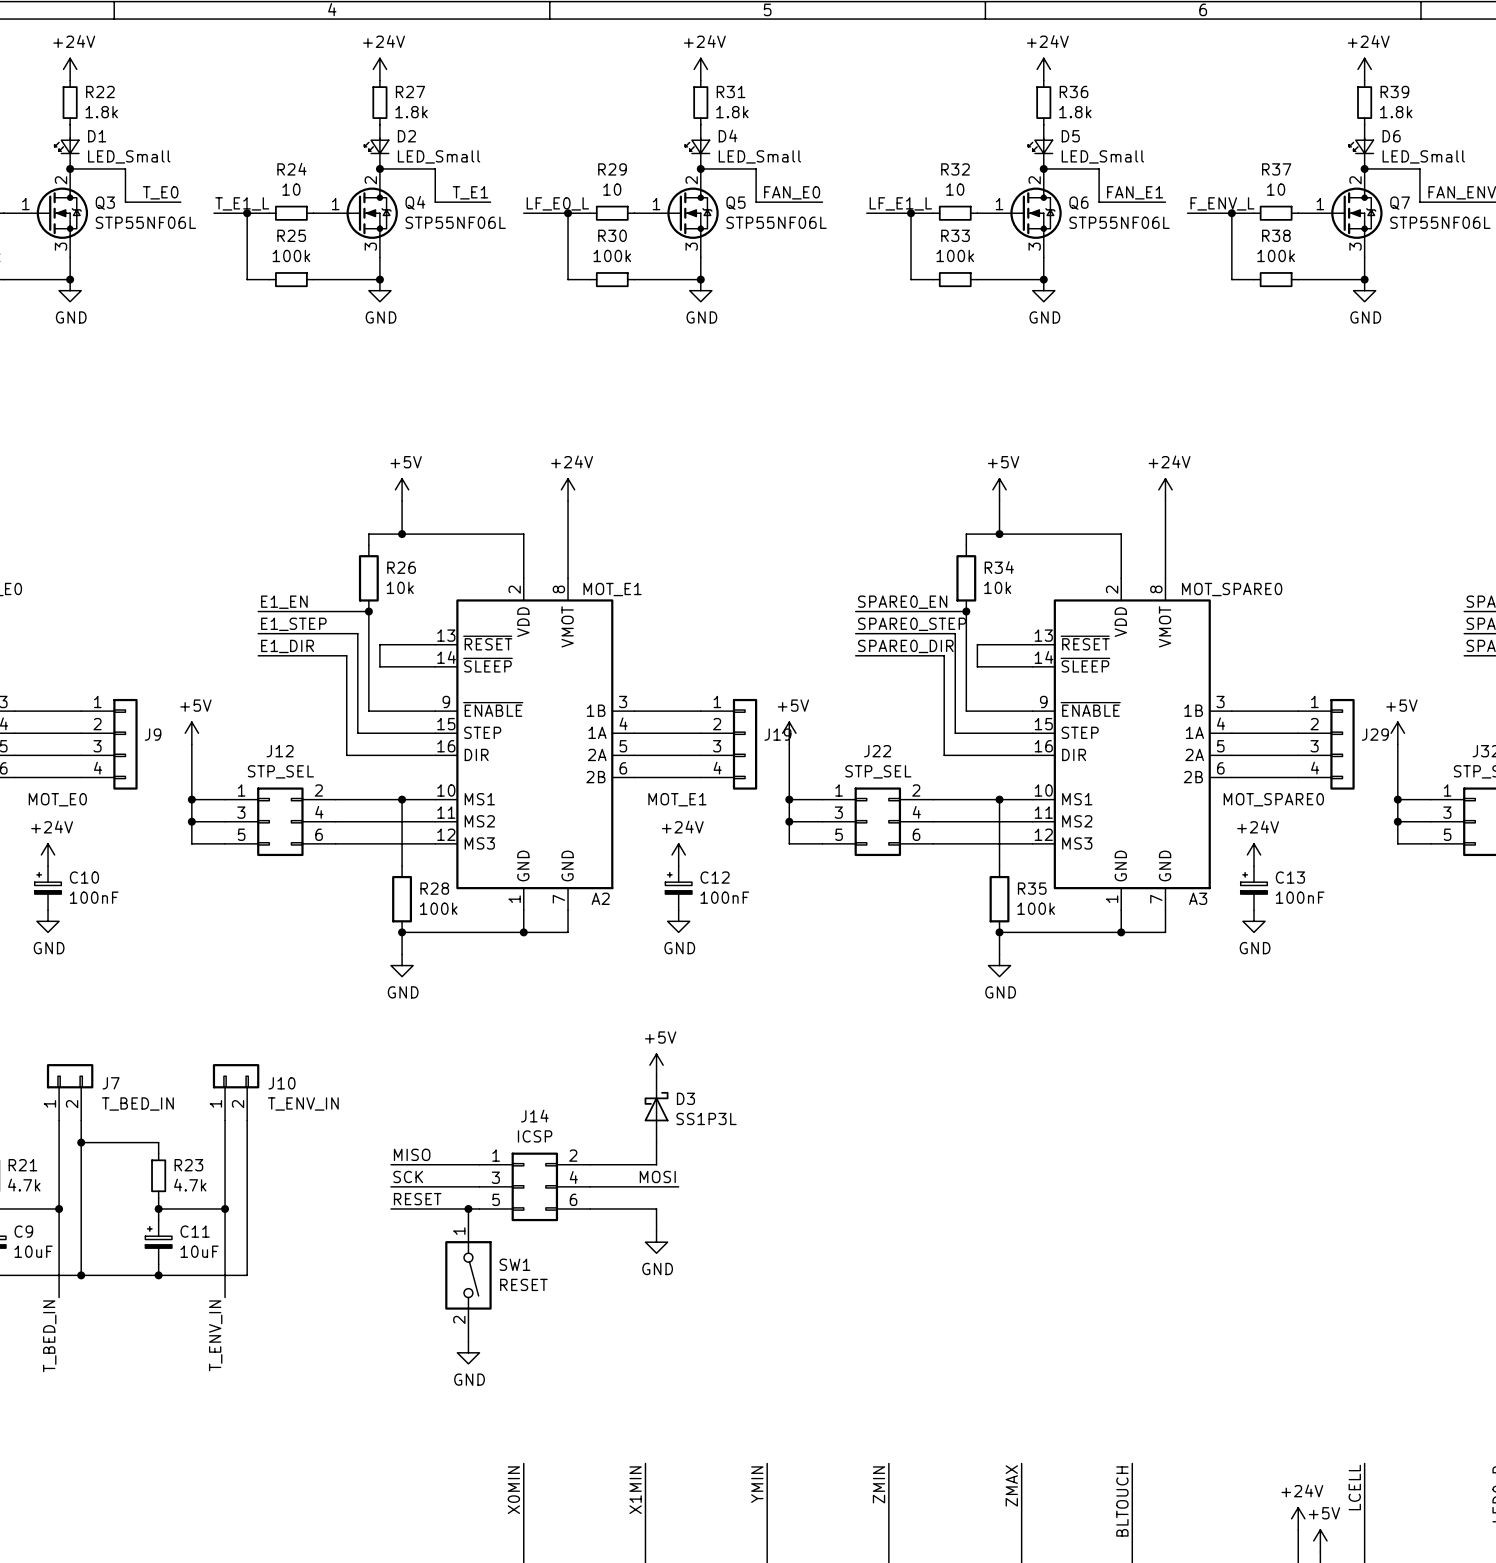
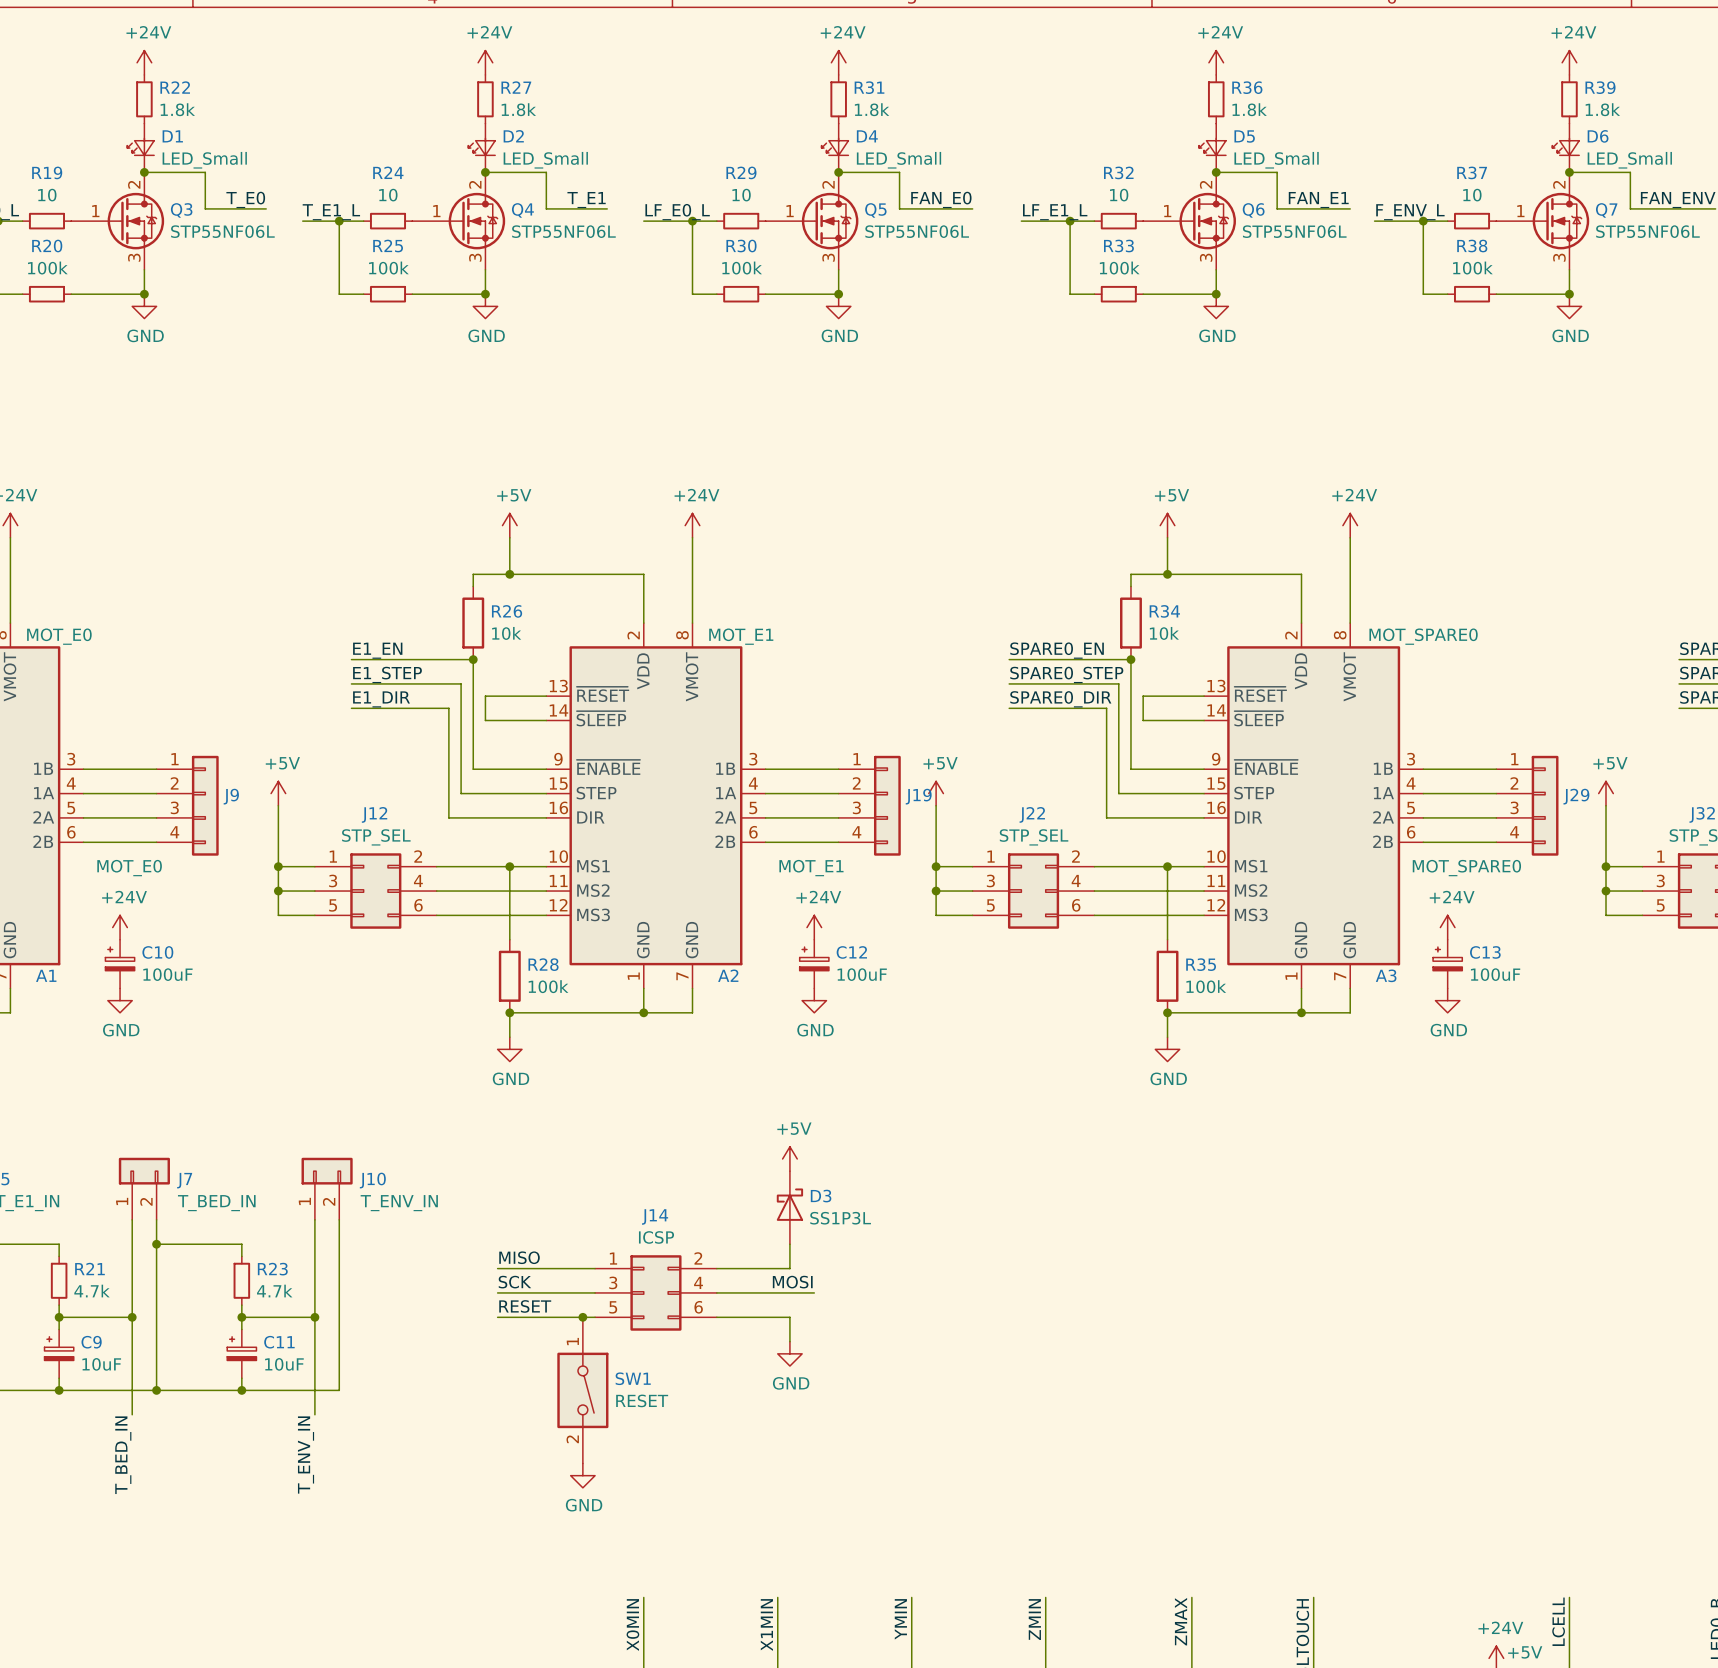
C10 value: 100nF (94, 897) -> 100uF (167, 974)
C12 value: 100nF (724, 897) -> 100uF (862, 974)
C13 value: 100nF (1300, 897) -> 100uF (1495, 974)

